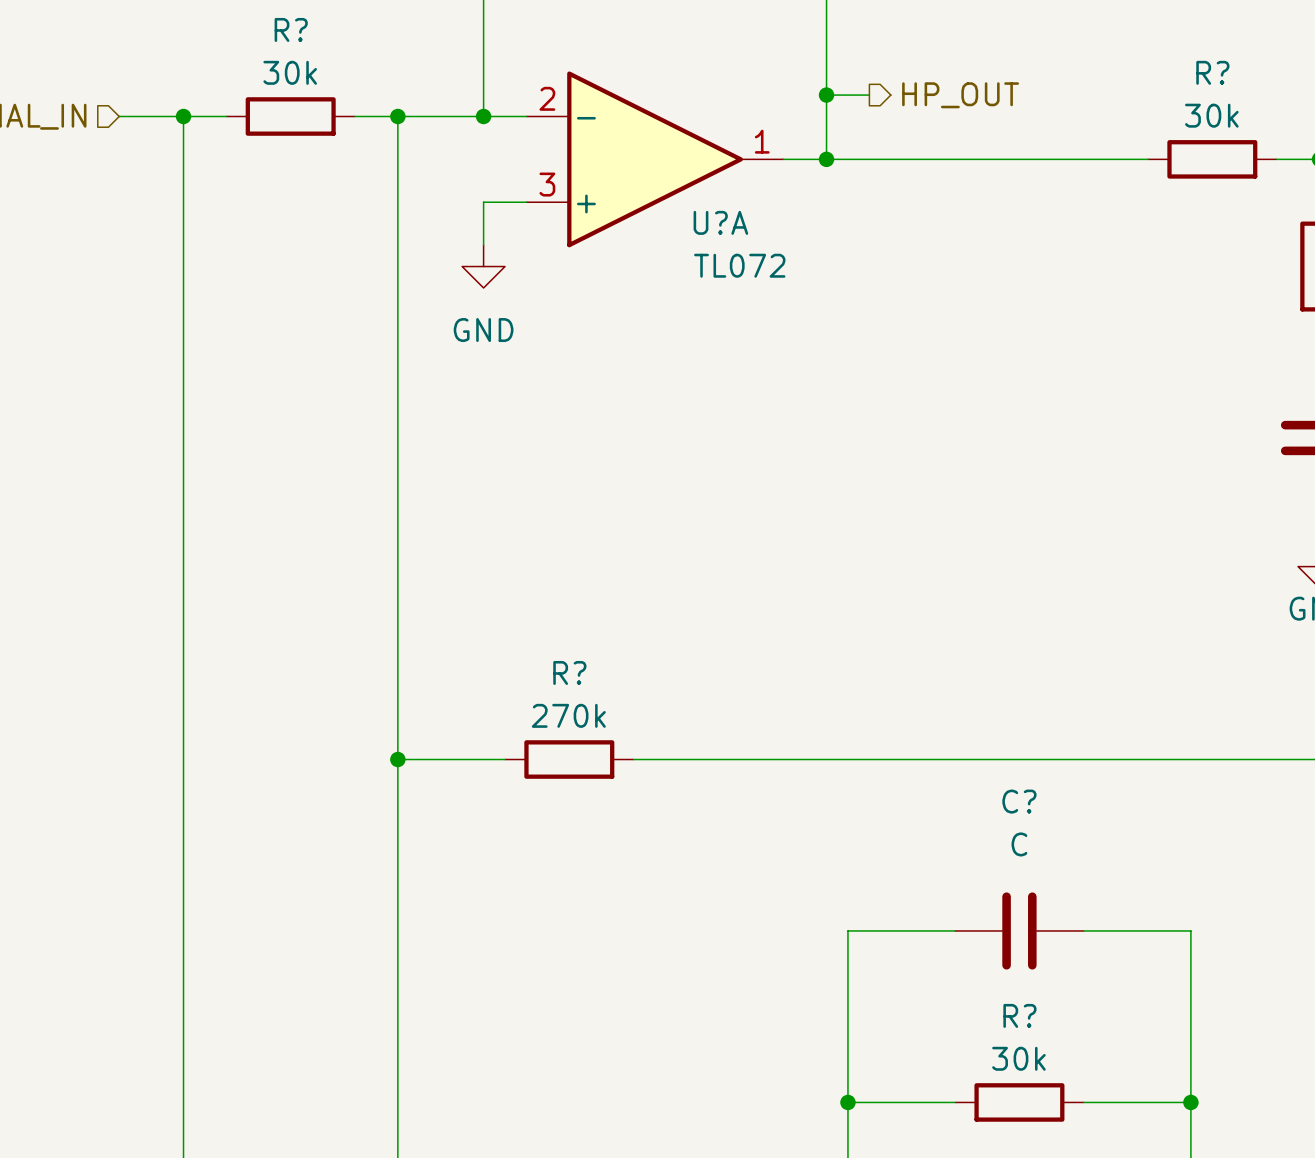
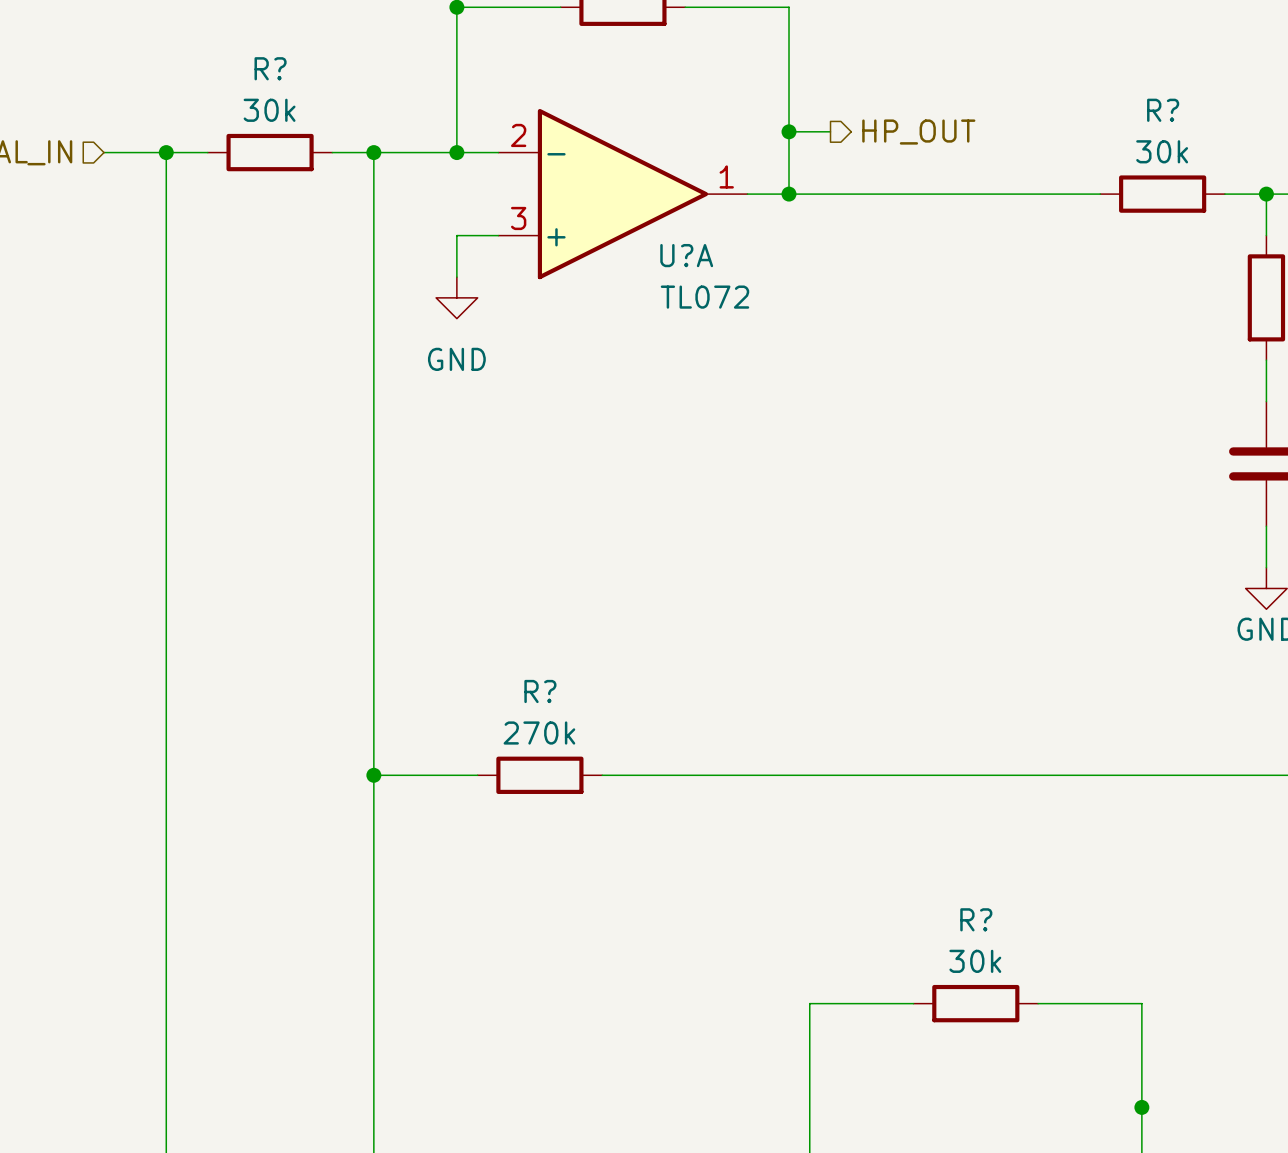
wire: (955, 930) (847, 930) (847, 995) -> (913, 1003) (809, 1003)
C?: C (1019, 930) -> none
wire: (1083, 930) (1190, 930) (1190, 995) -> (1038, 1003) (1141, 1003)
wire: (847, 1102) (955, 1102) -> none
junction: (847, 1102) -> none
R? position: (1019, 1102) -> (975, 1003)
wire: (1083, 1102) (1190, 1102) -> none

